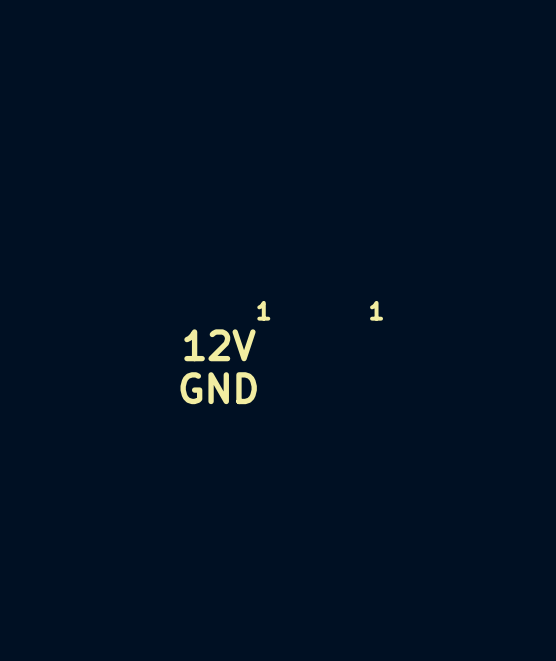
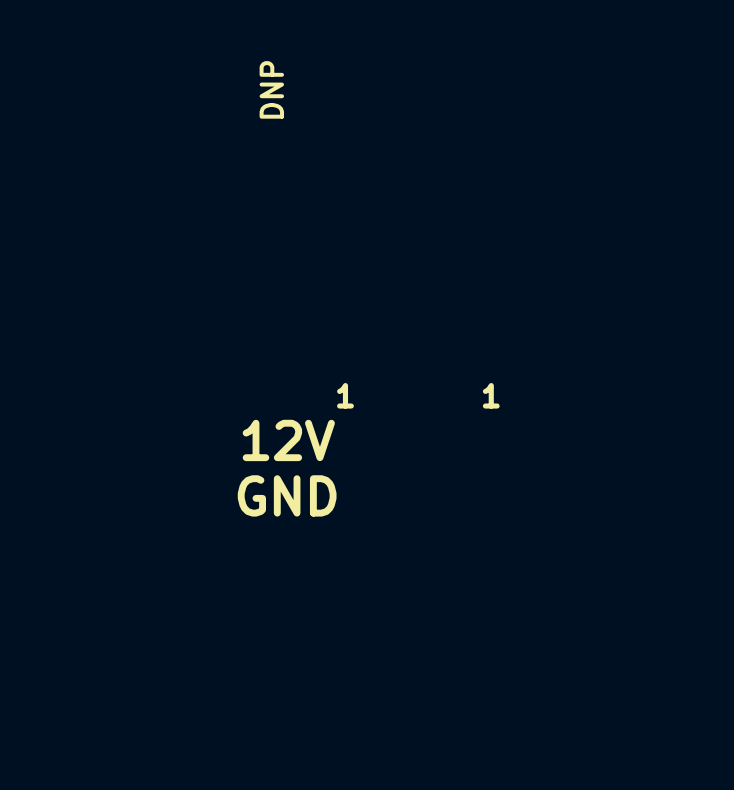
text: none -> DNP (271, 89)

